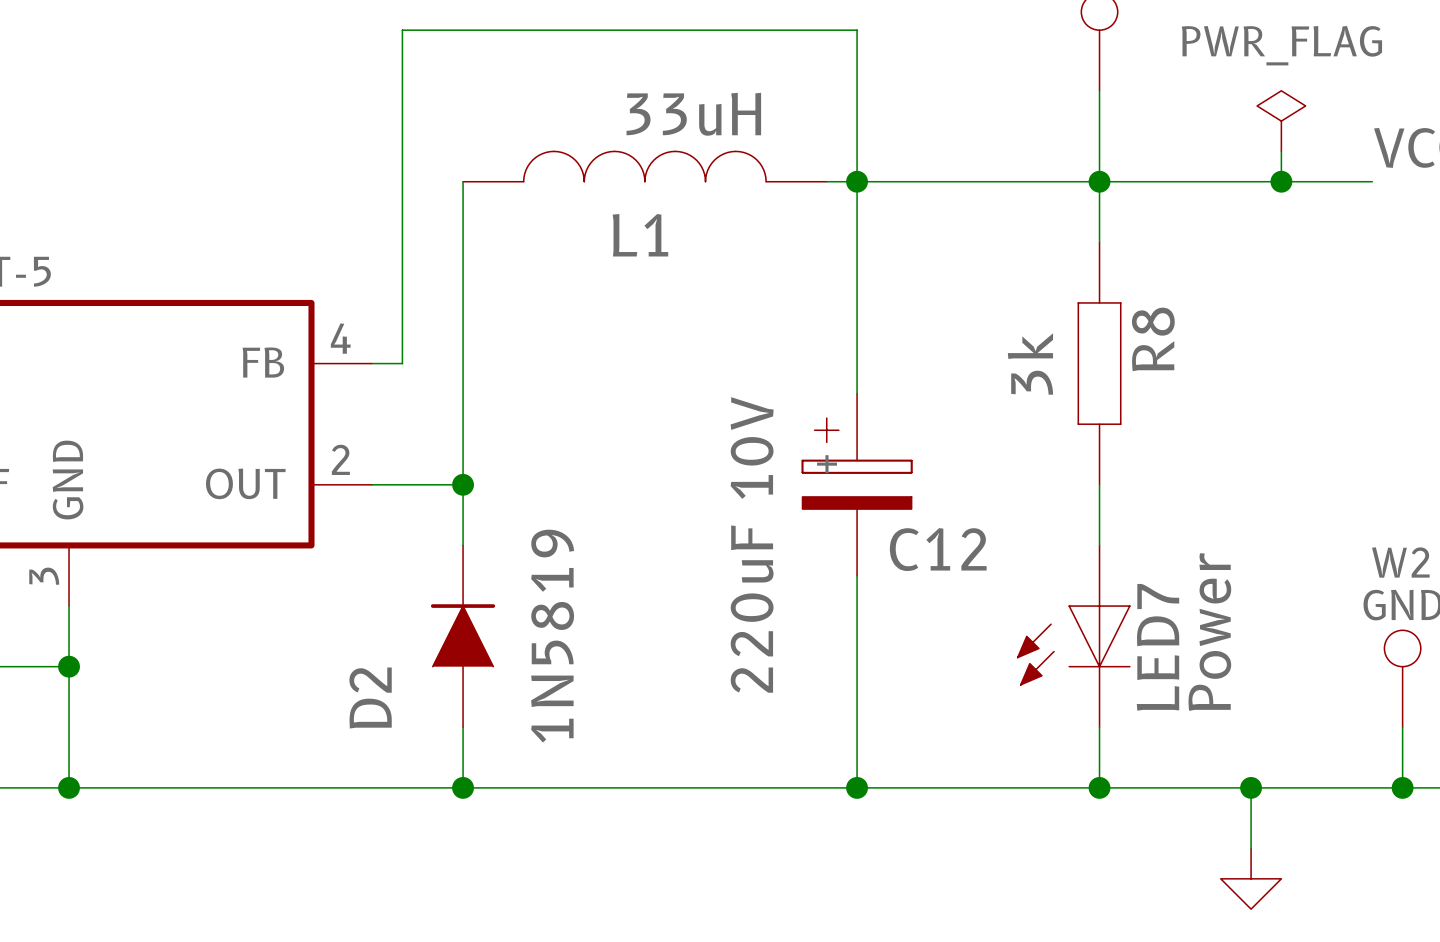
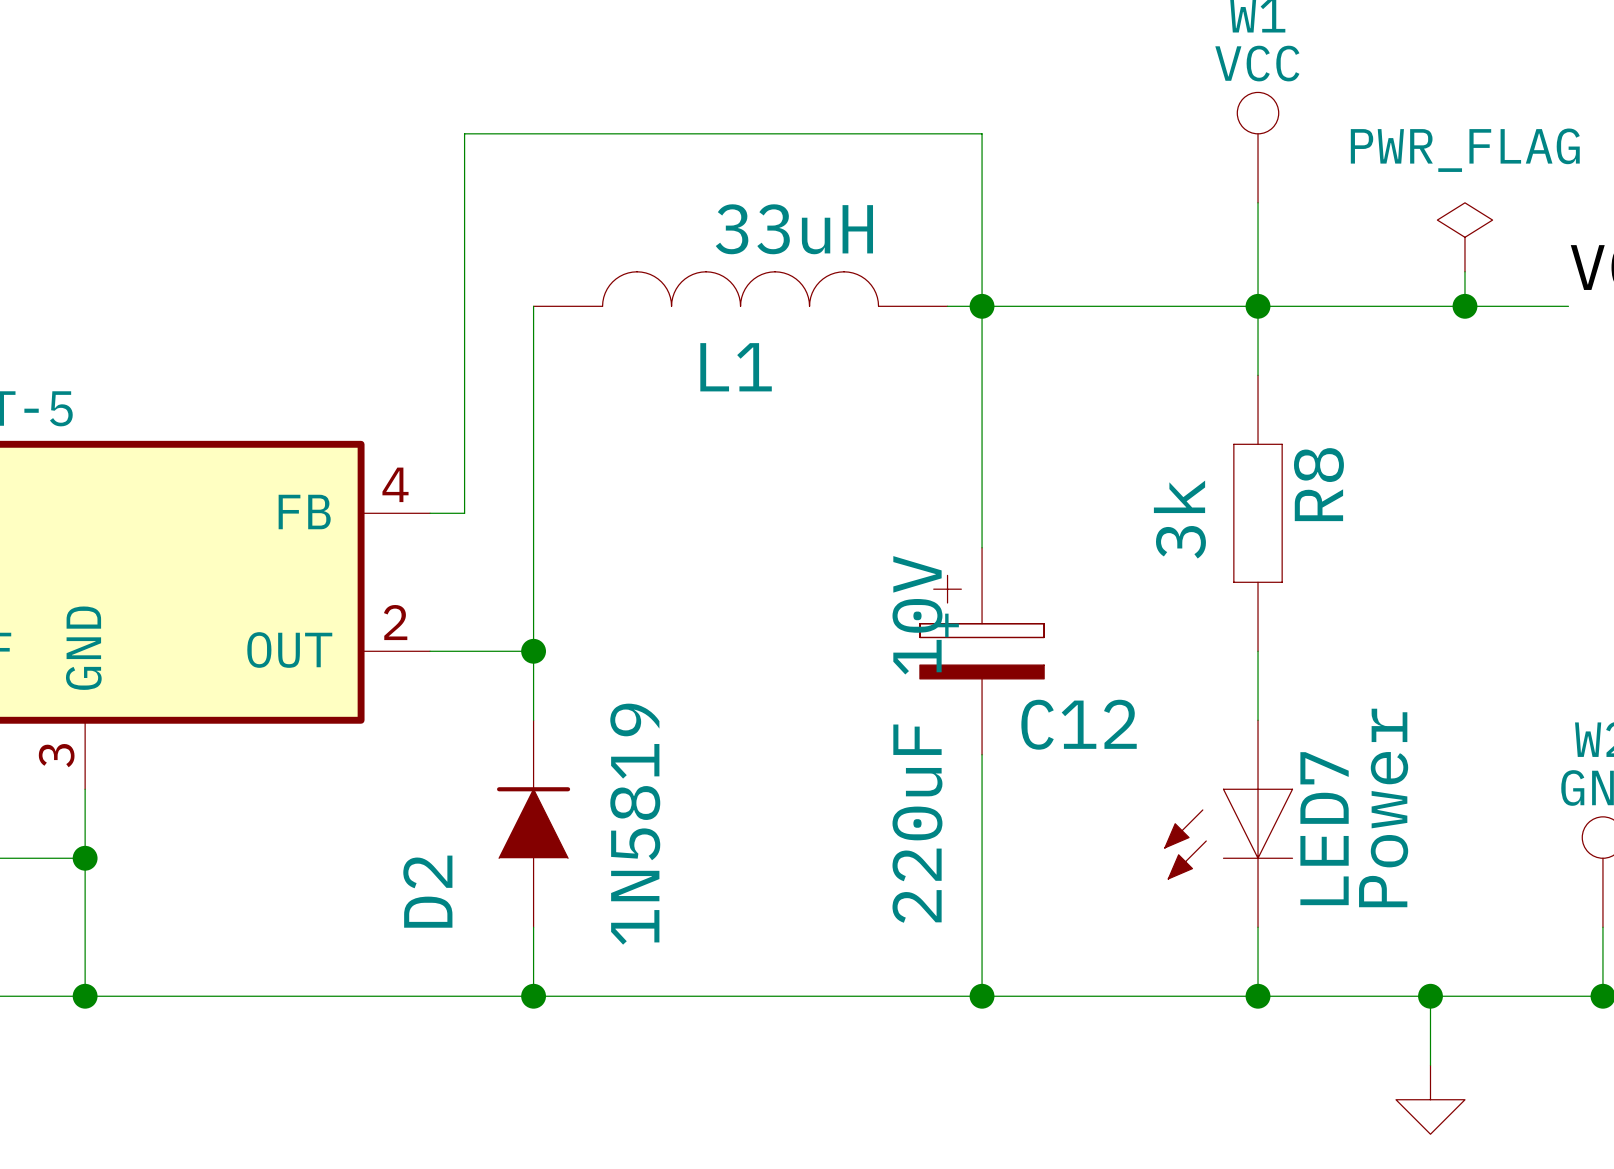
C12 value position: 220uF 10V (752, 544) -> 220uF 10V (917, 739)

